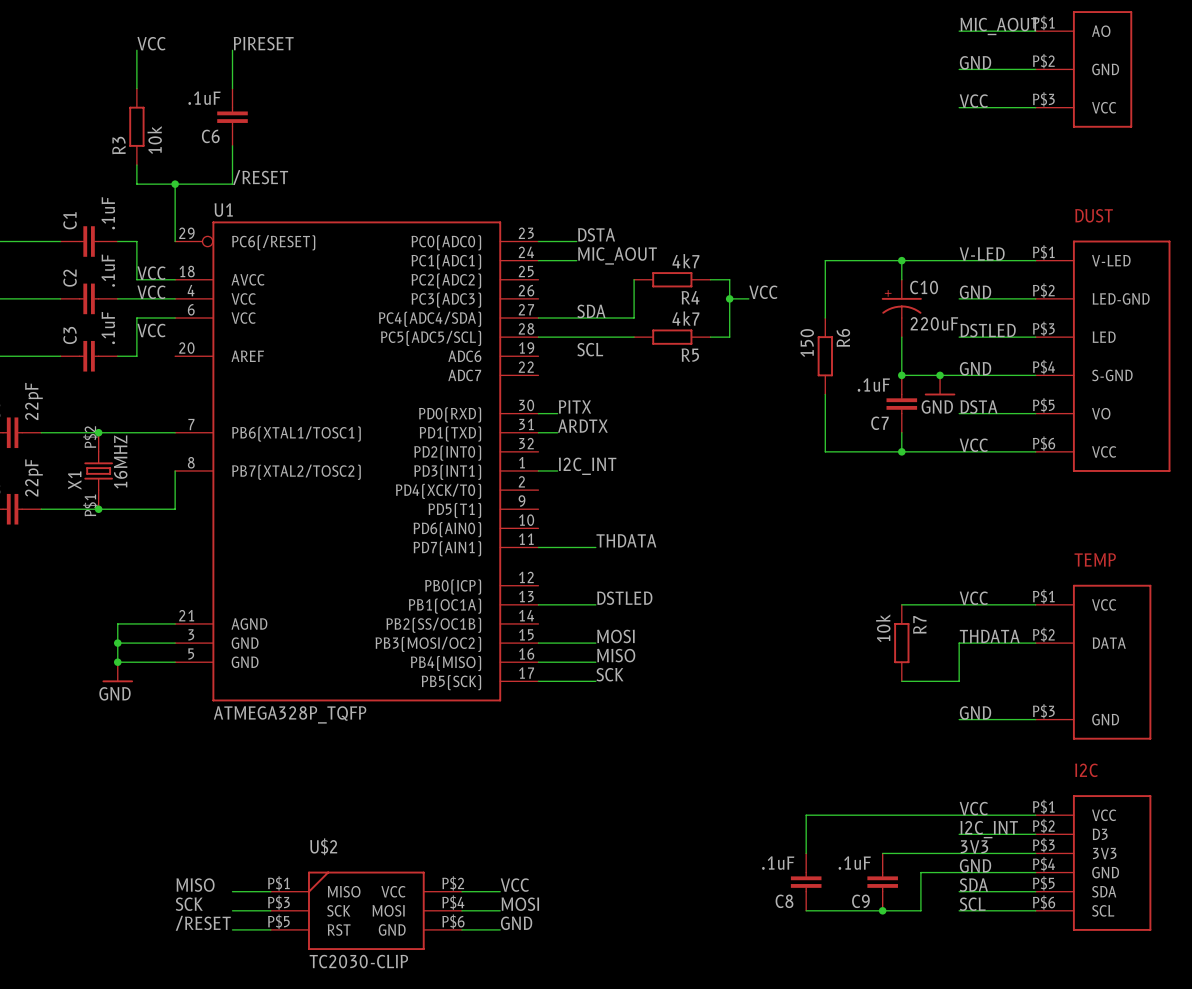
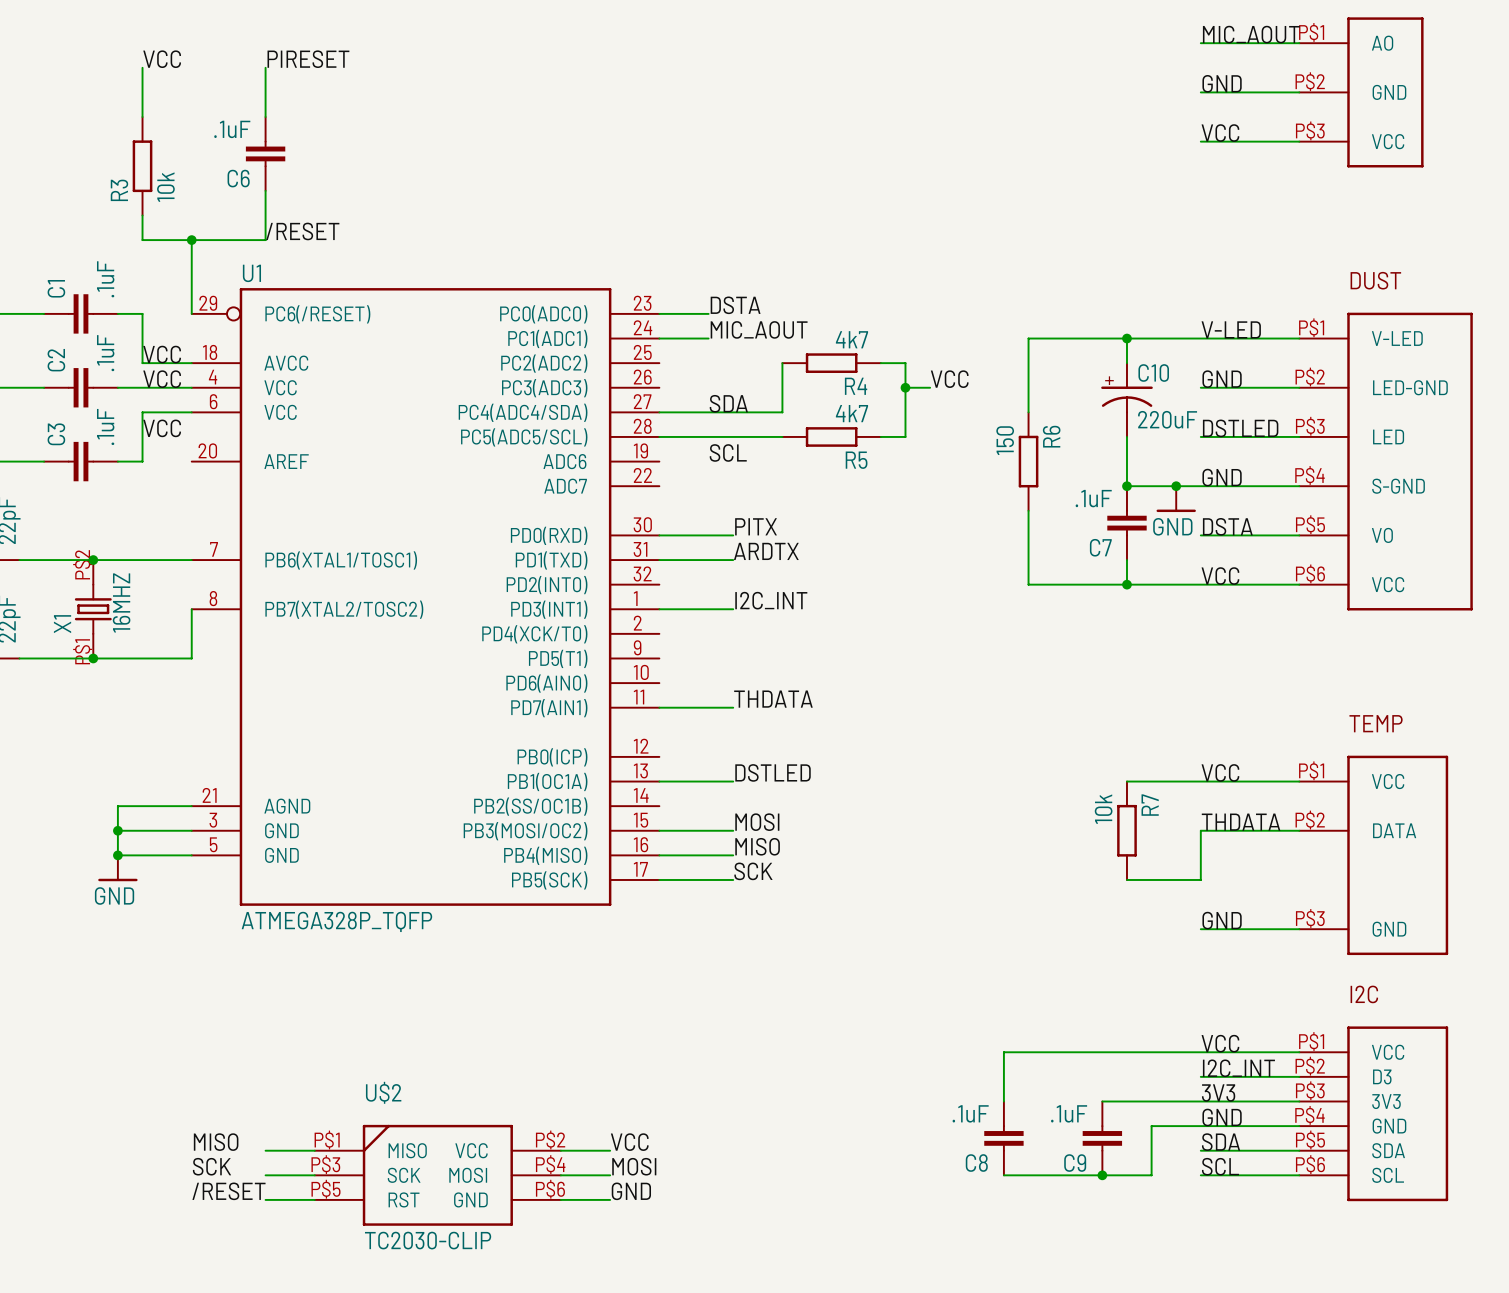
label position: PITX (574, 406) -> PITX (755, 526)
wire: none -> (683, 535) (733, 535)
label position: ARDTX (582, 426) -> ARDTX (766, 551)
wire: none -> (683, 560) (733, 560)
label position: I2C_INT (587, 466) -> I2C_INT (771, 600)
wire: none -> (683, 609) (733, 609)

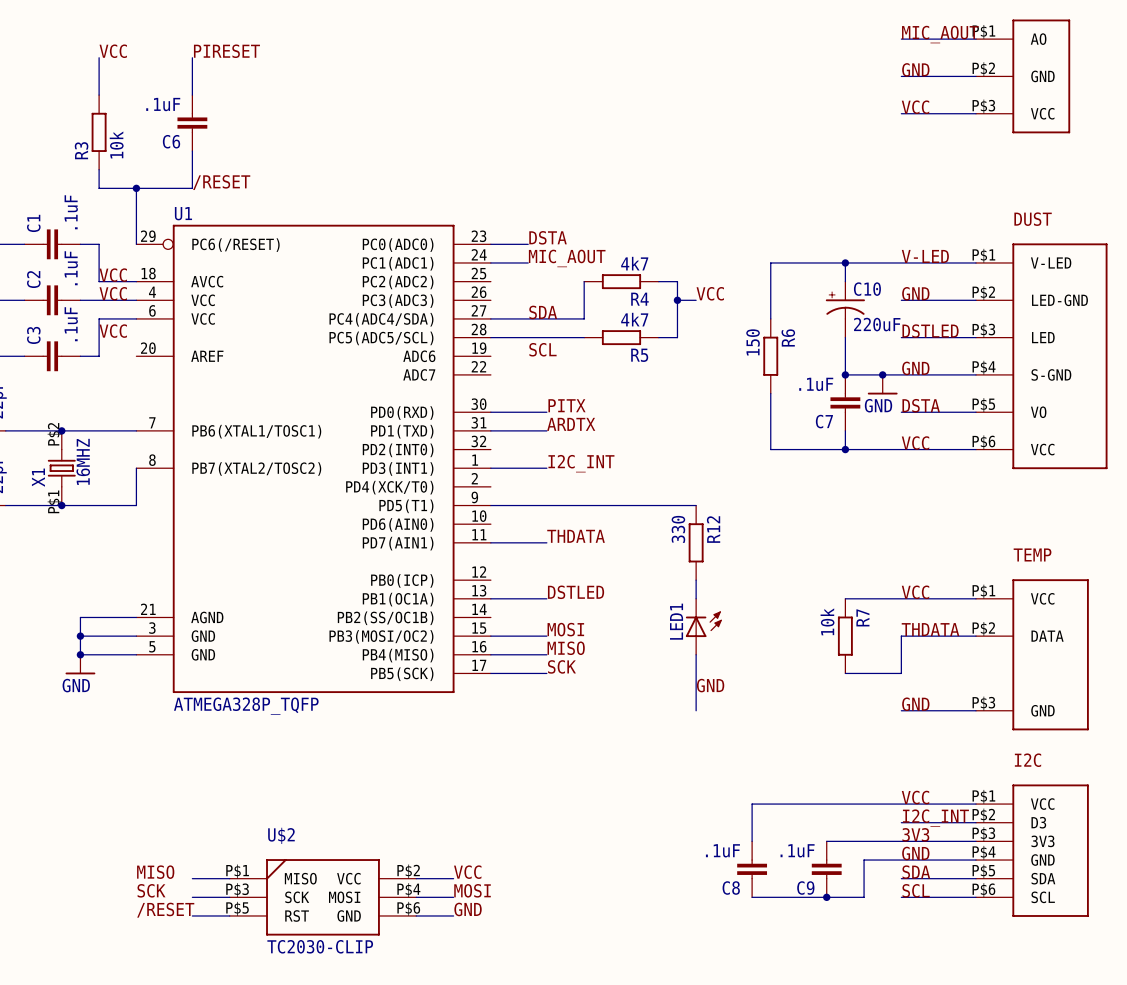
wire: none -> (490, 505) (696, 505)
R12: none -> 330 (696, 542)
wire: none -> (696, 580) (696, 598)
LED1: none -> (703, 626)
wire: none -> (696, 654) (696, 710)
label: none -> GND (710, 685)

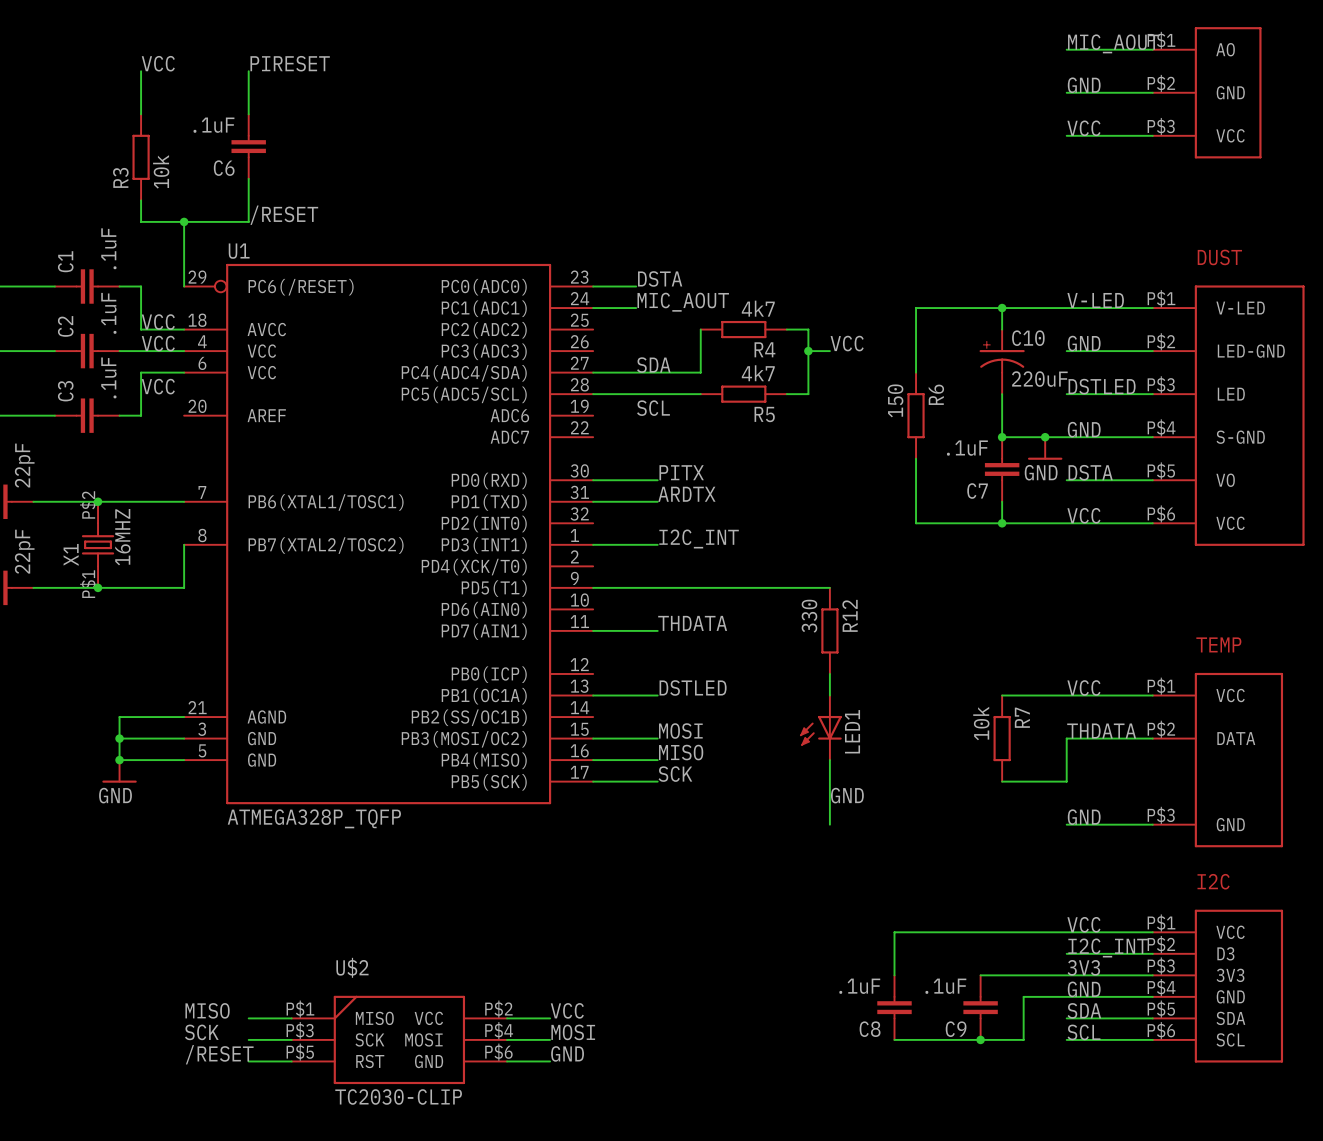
LED1 rotation: 0° (703, 624) -> 180° (820, 730)

